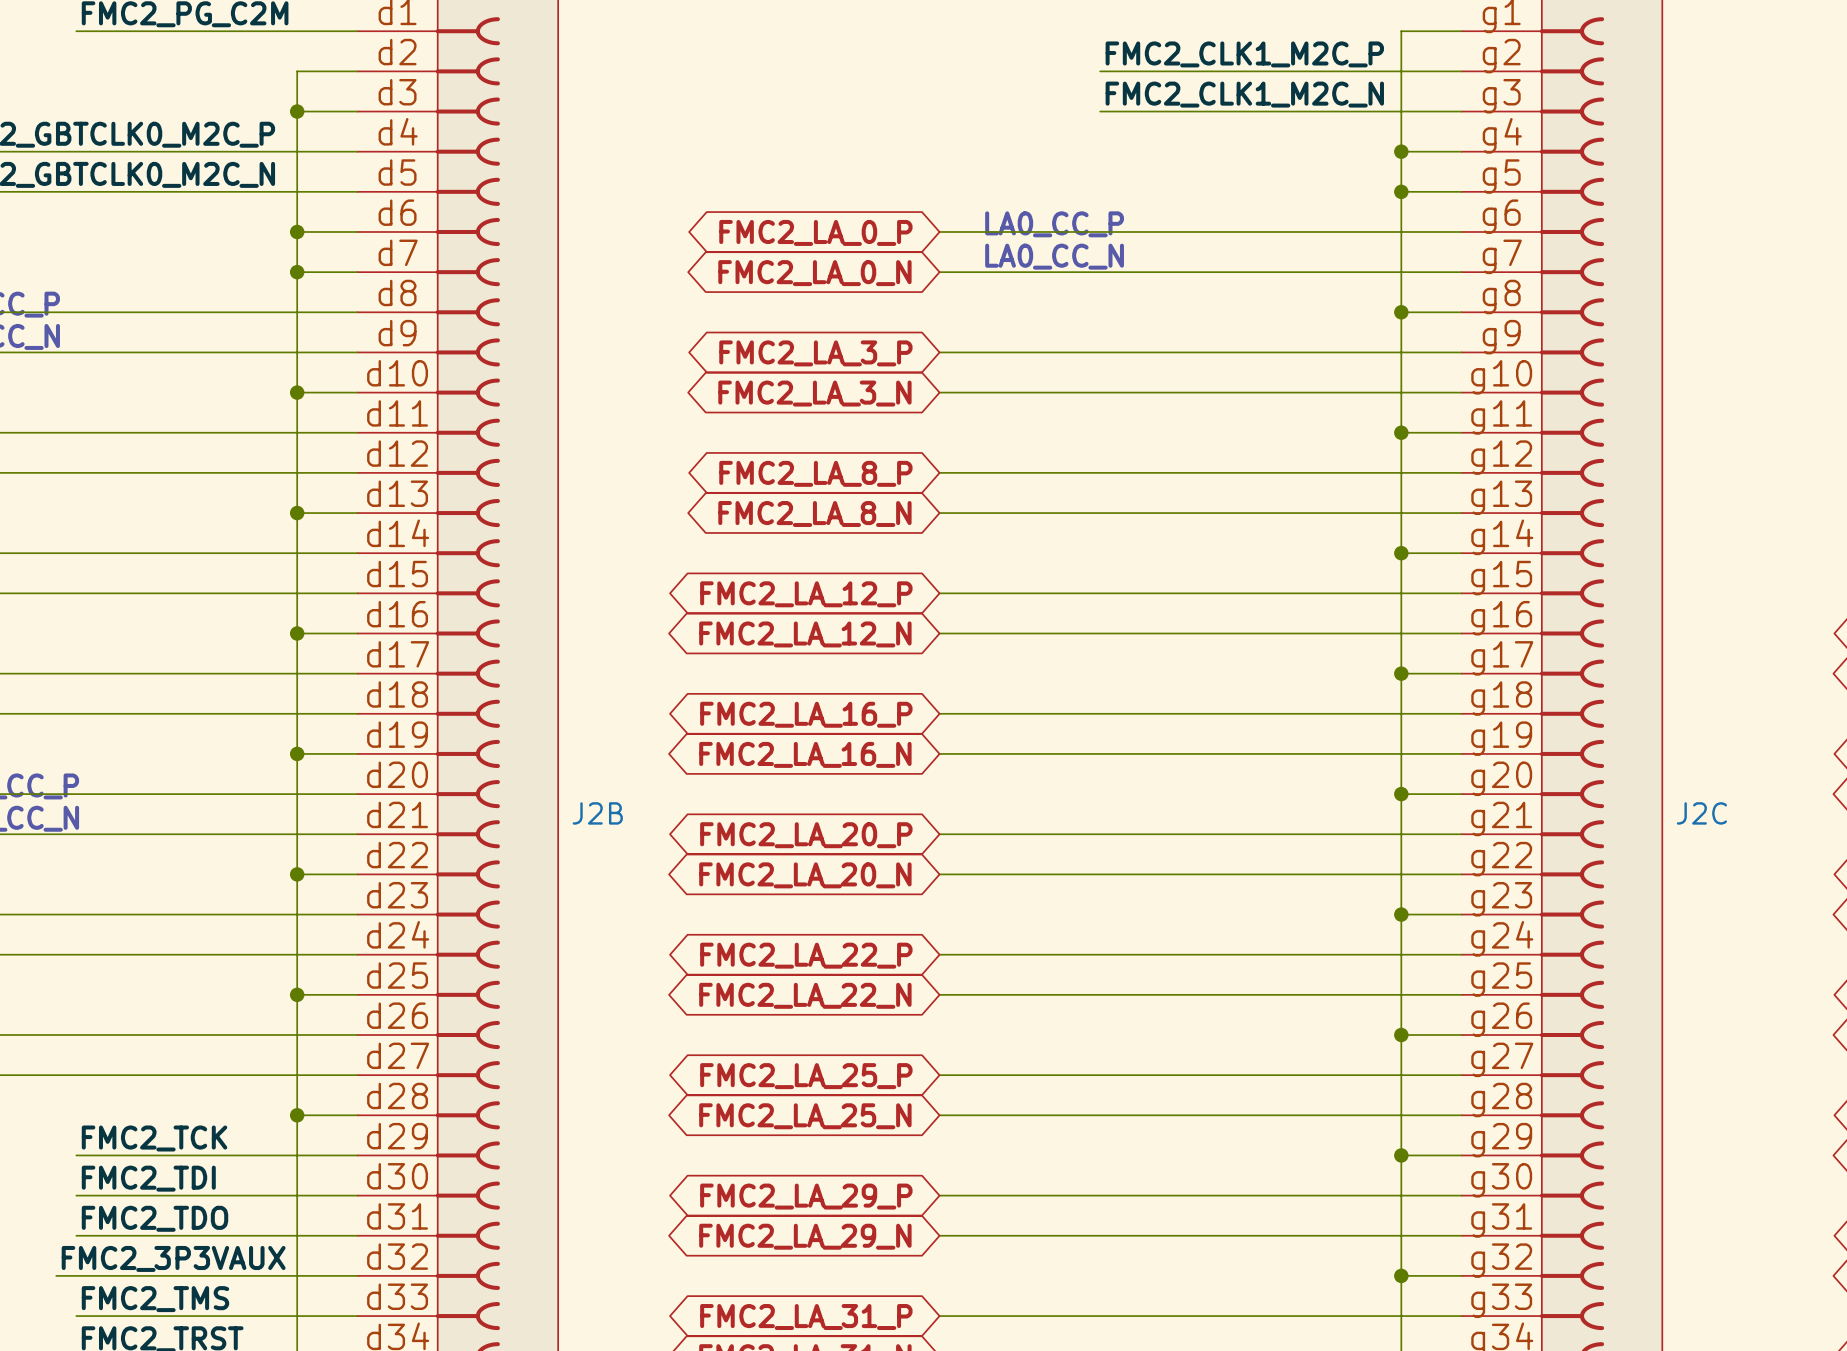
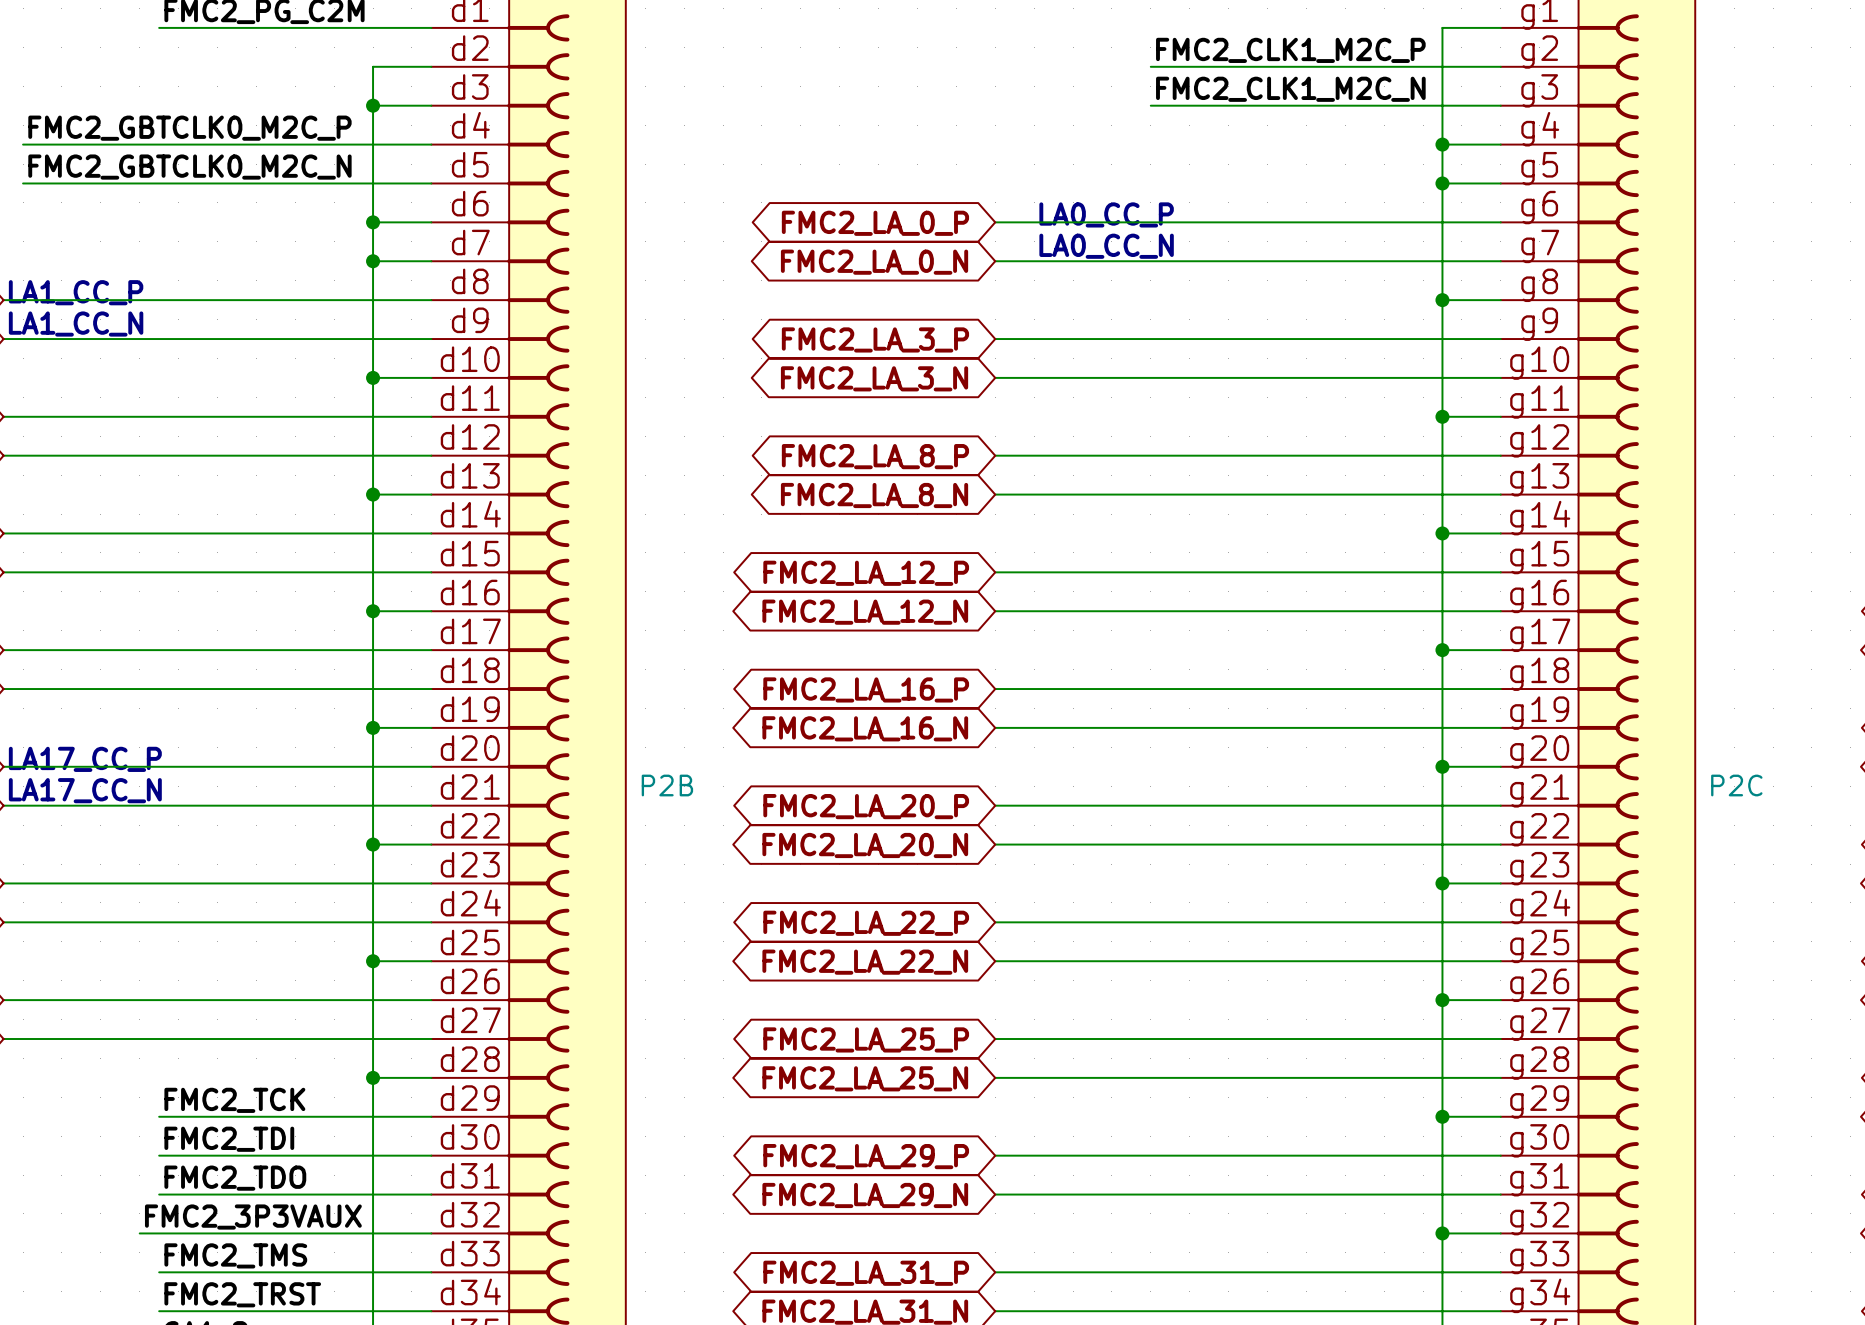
J2B name: J2B (597, 813) -> P2B (667, 785)
J2C name: J2C (1701, 813) -> P2C (1736, 785)

